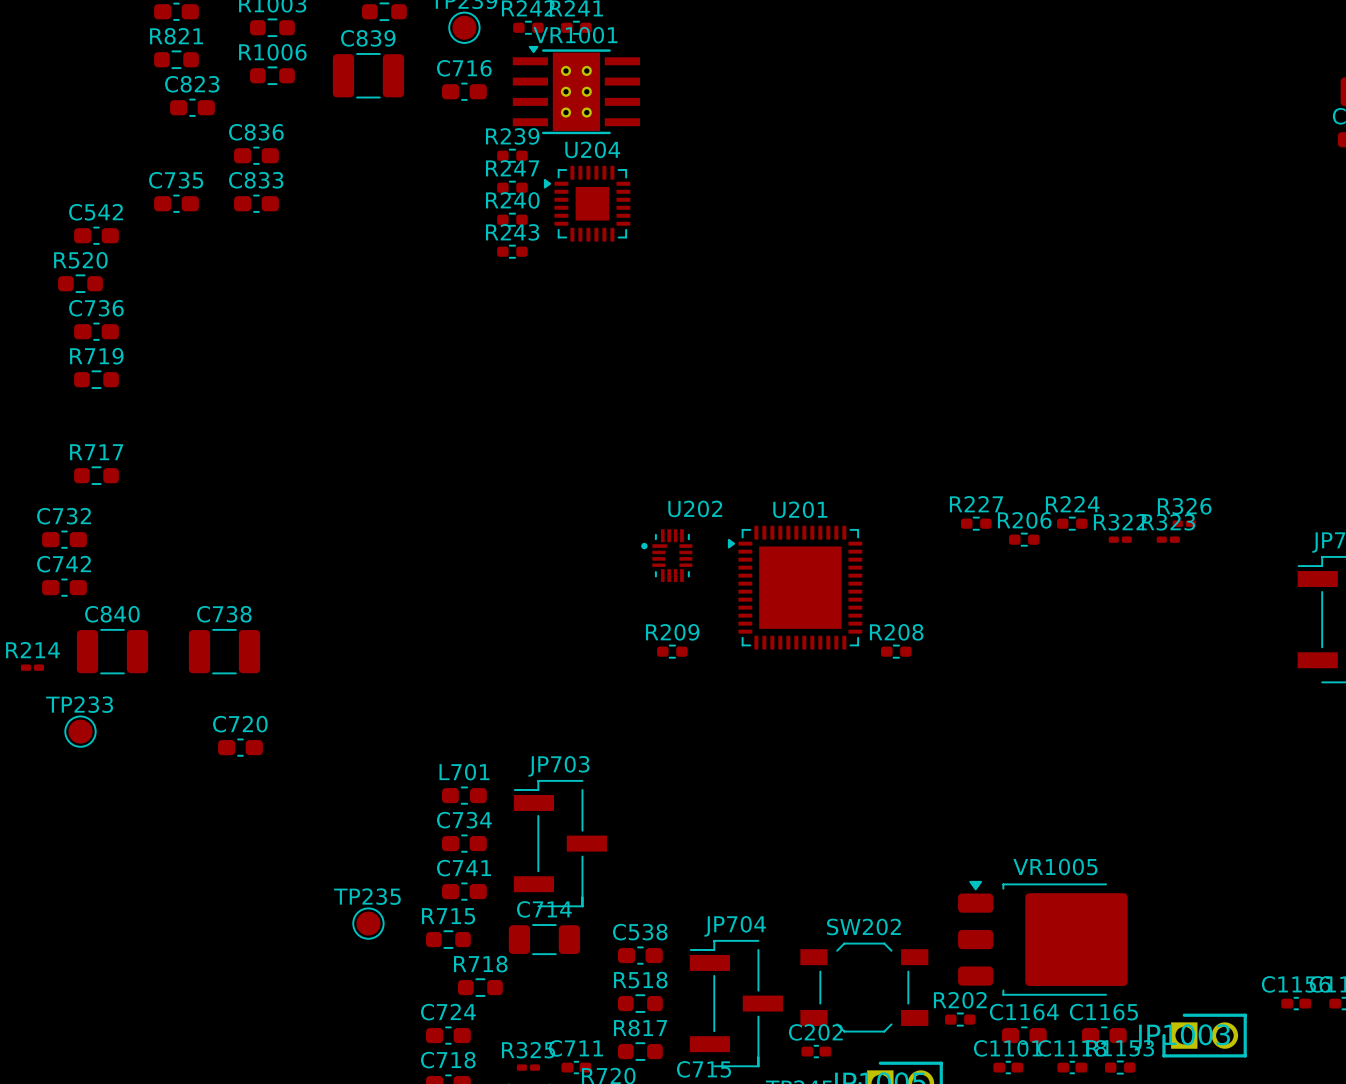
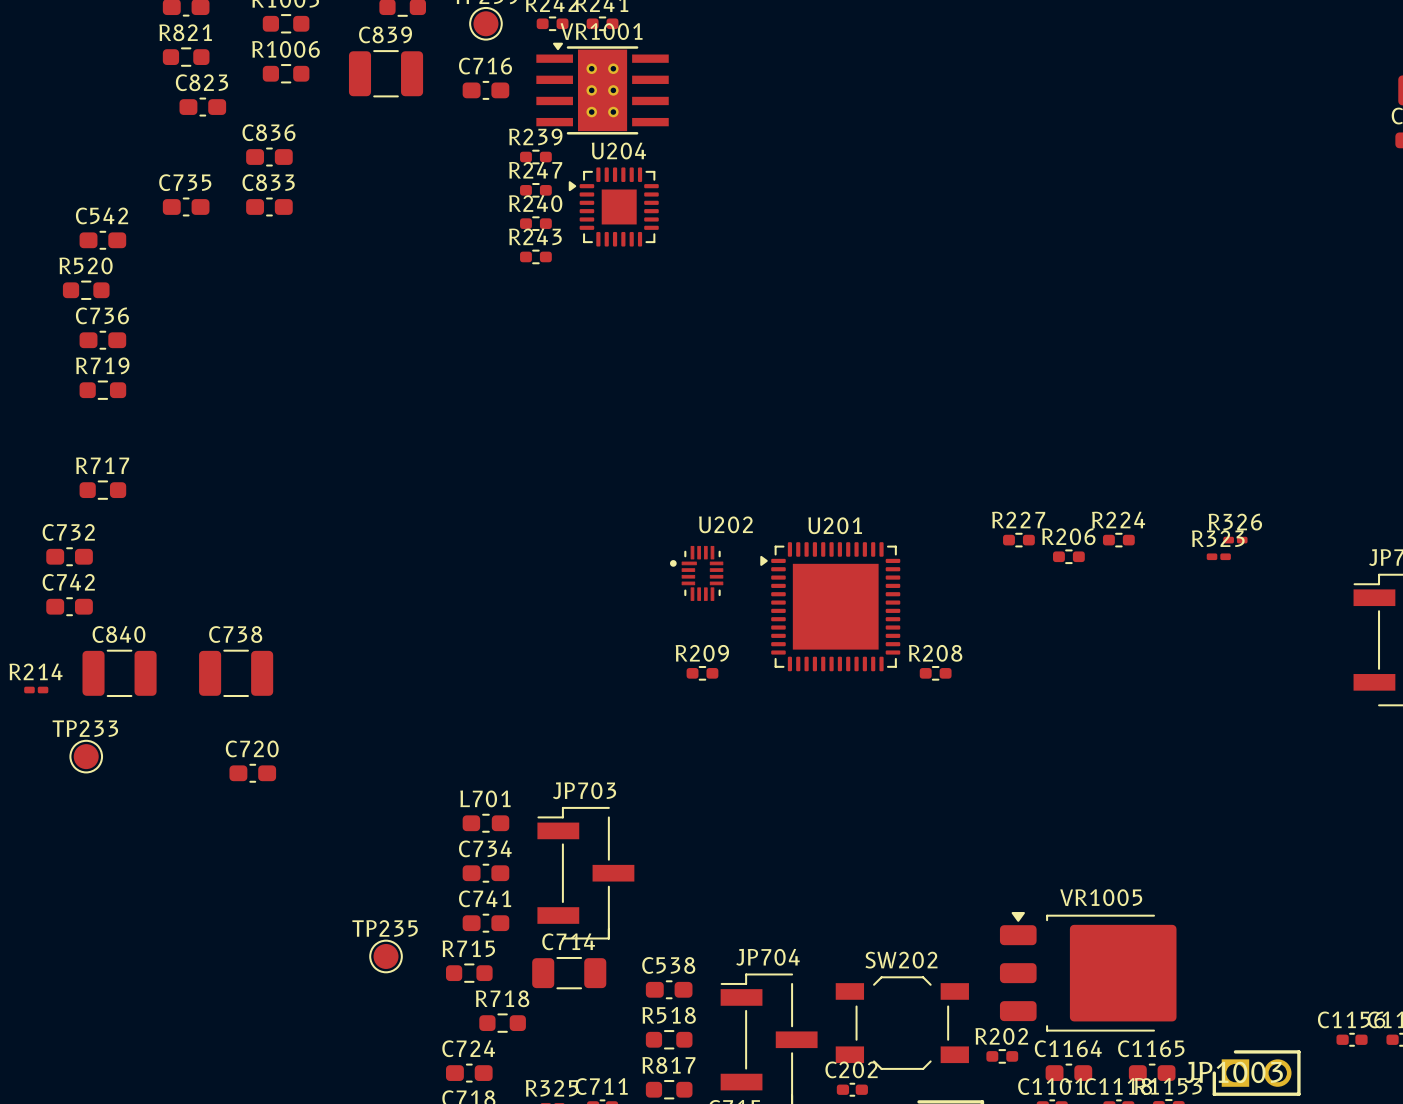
R322: (1120, 539) -> none

